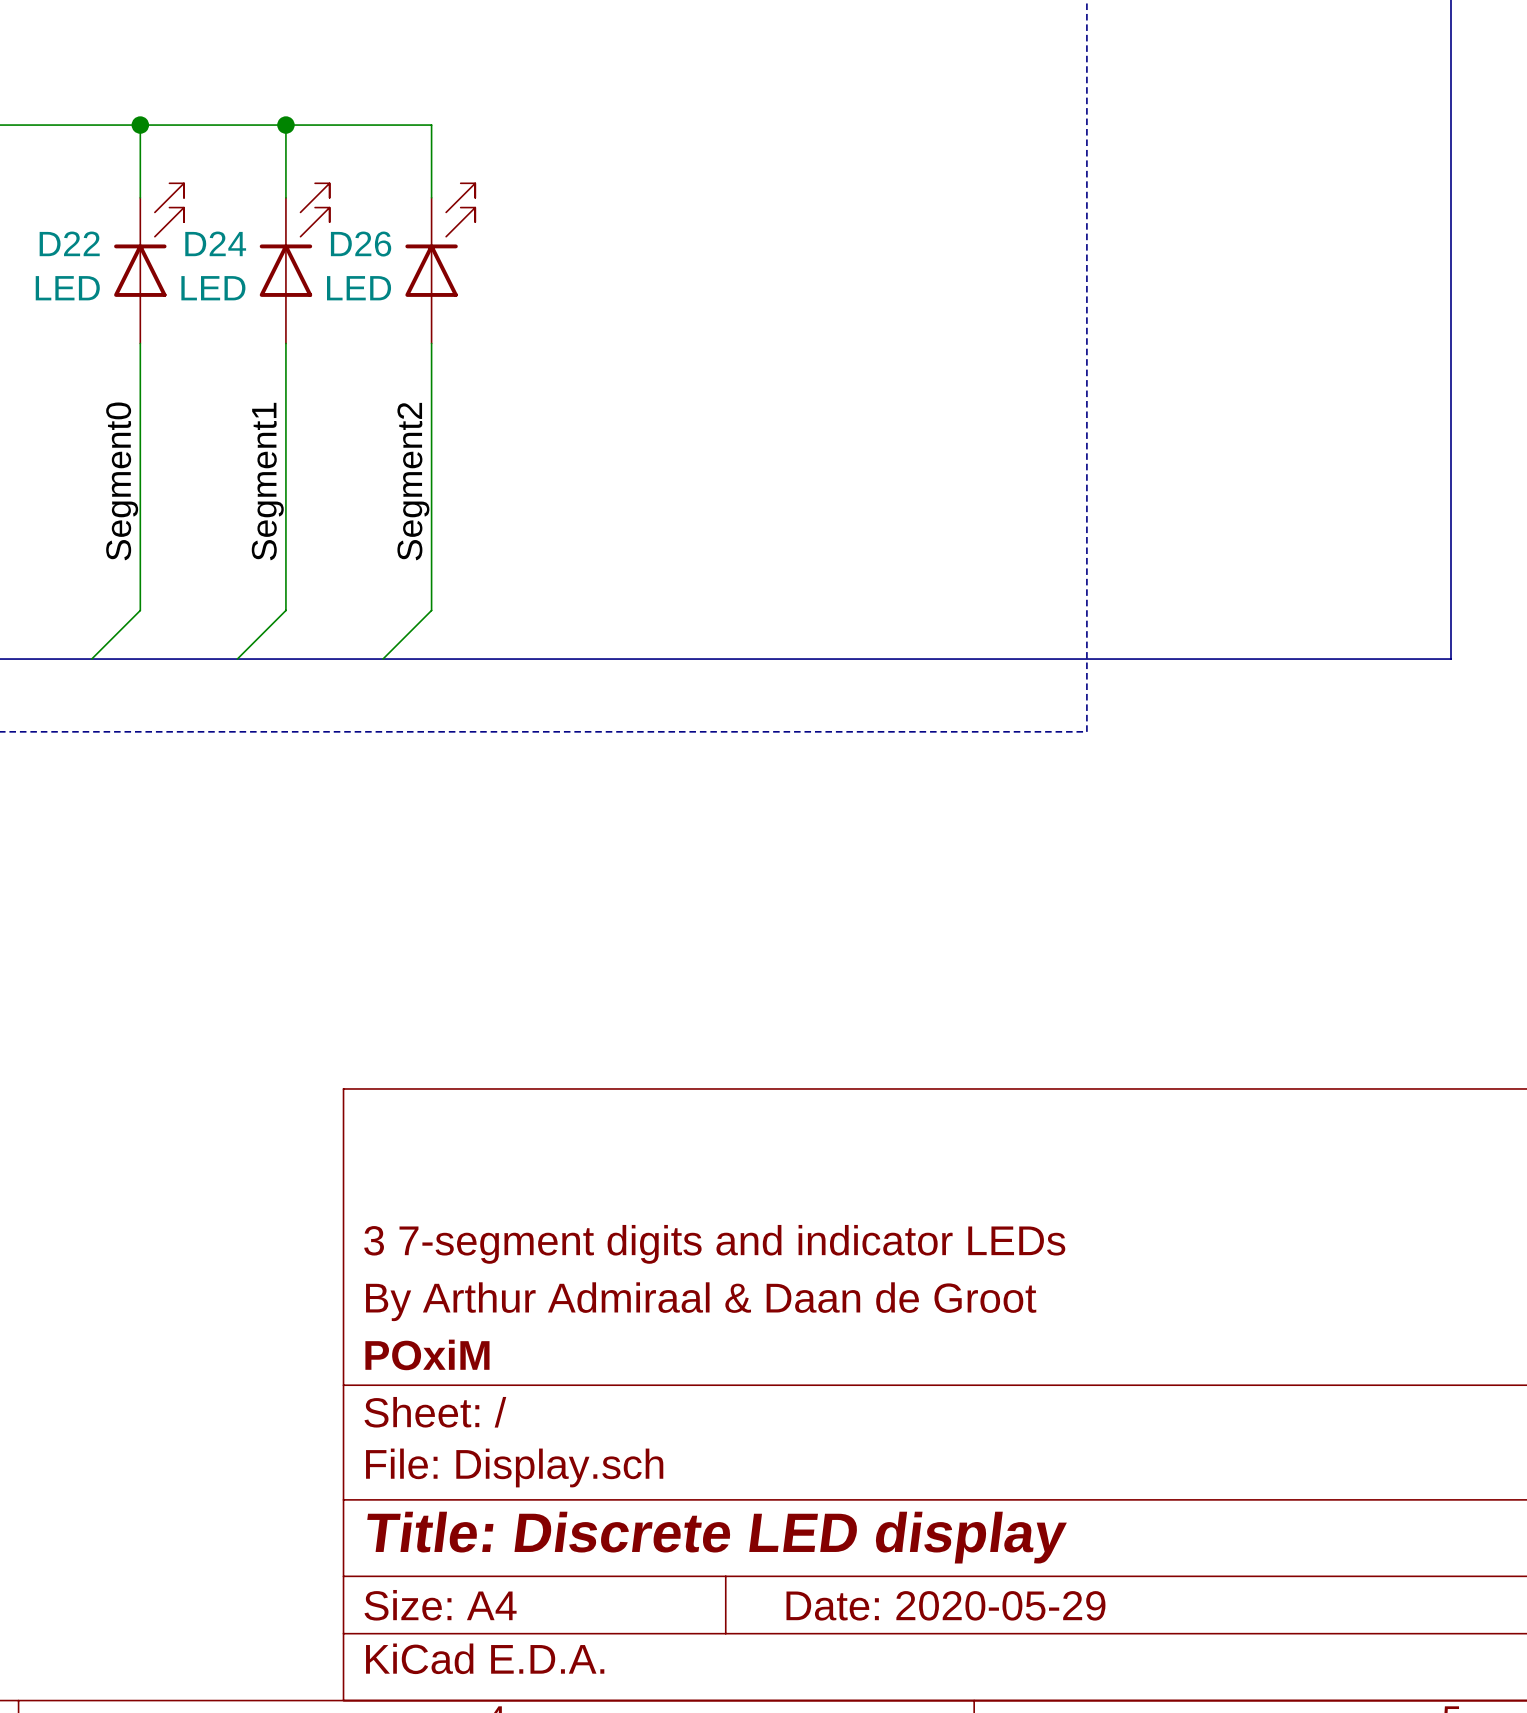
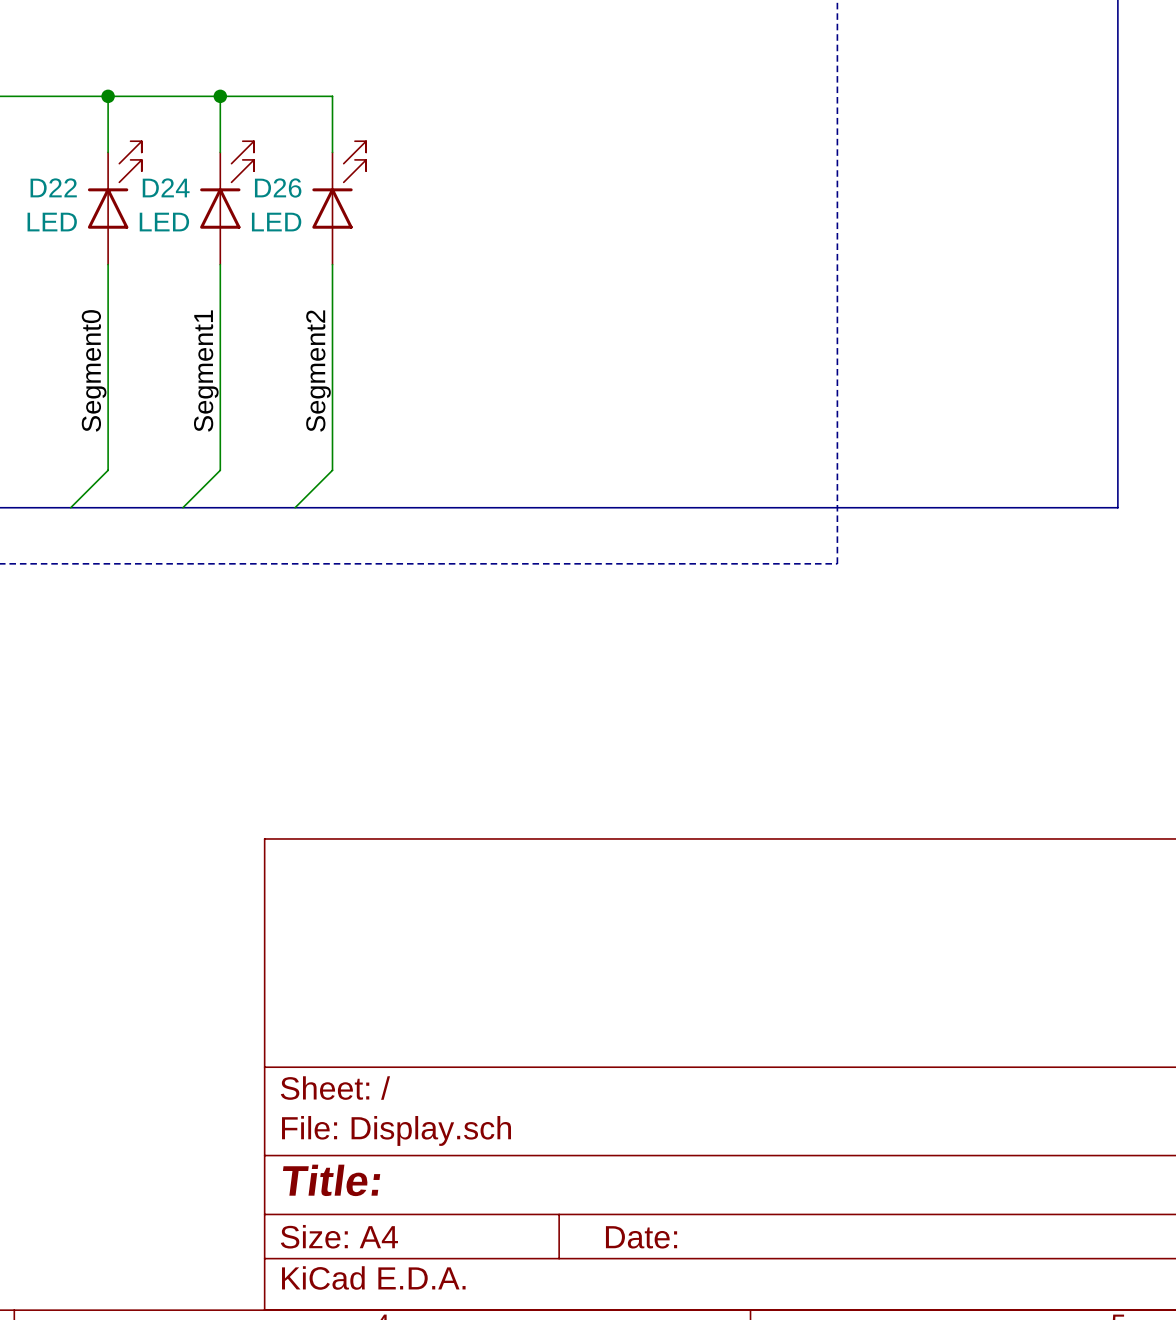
title block: 3 7-segment digits and indicator LEDs (714, 1244) -> none
title block: By Arthur Admiraal & Daan de Groot (701, 1301) -> none
title block: POxiM (427, 1354) -> none
title block: Title: Discrete LED display (717, 1537) -> Title: (331, 1180)
title block: Date: 2020-05-29 (945, 1605) -> Date: (641, 1237)

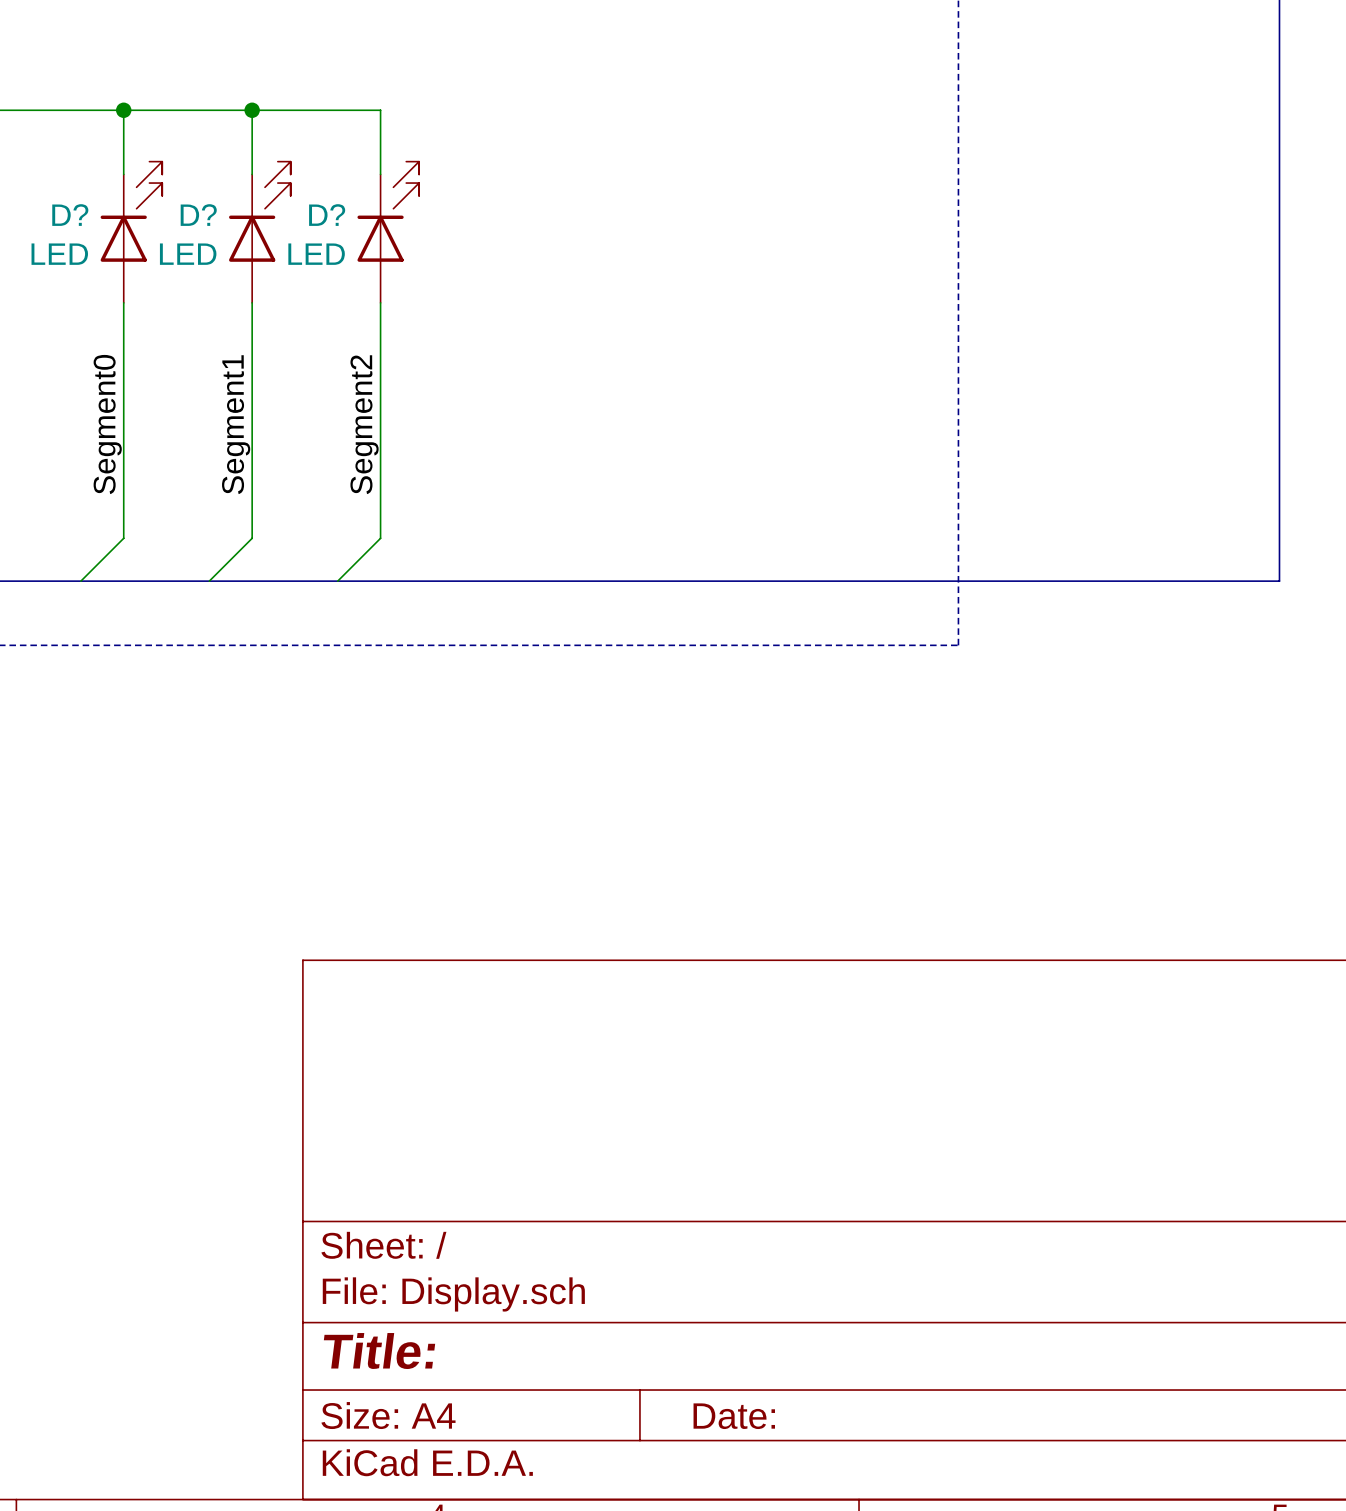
D22 name: D22 (53, 187) -> D? (70, 215)
D24 name: D24 (166, 187) -> D? (198, 215)
D26 name: D26 (278, 188) -> D? (327, 215)

